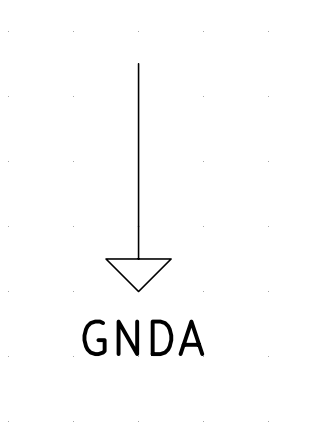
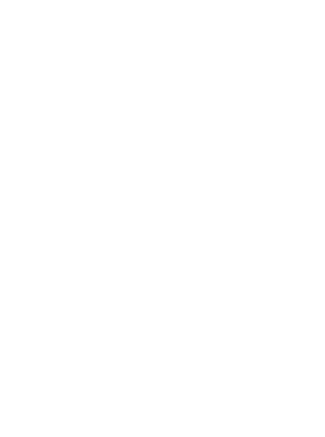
wire: (138, 63) (138, 226) -> none
power symbol: GNDA (138, 258) -> none

